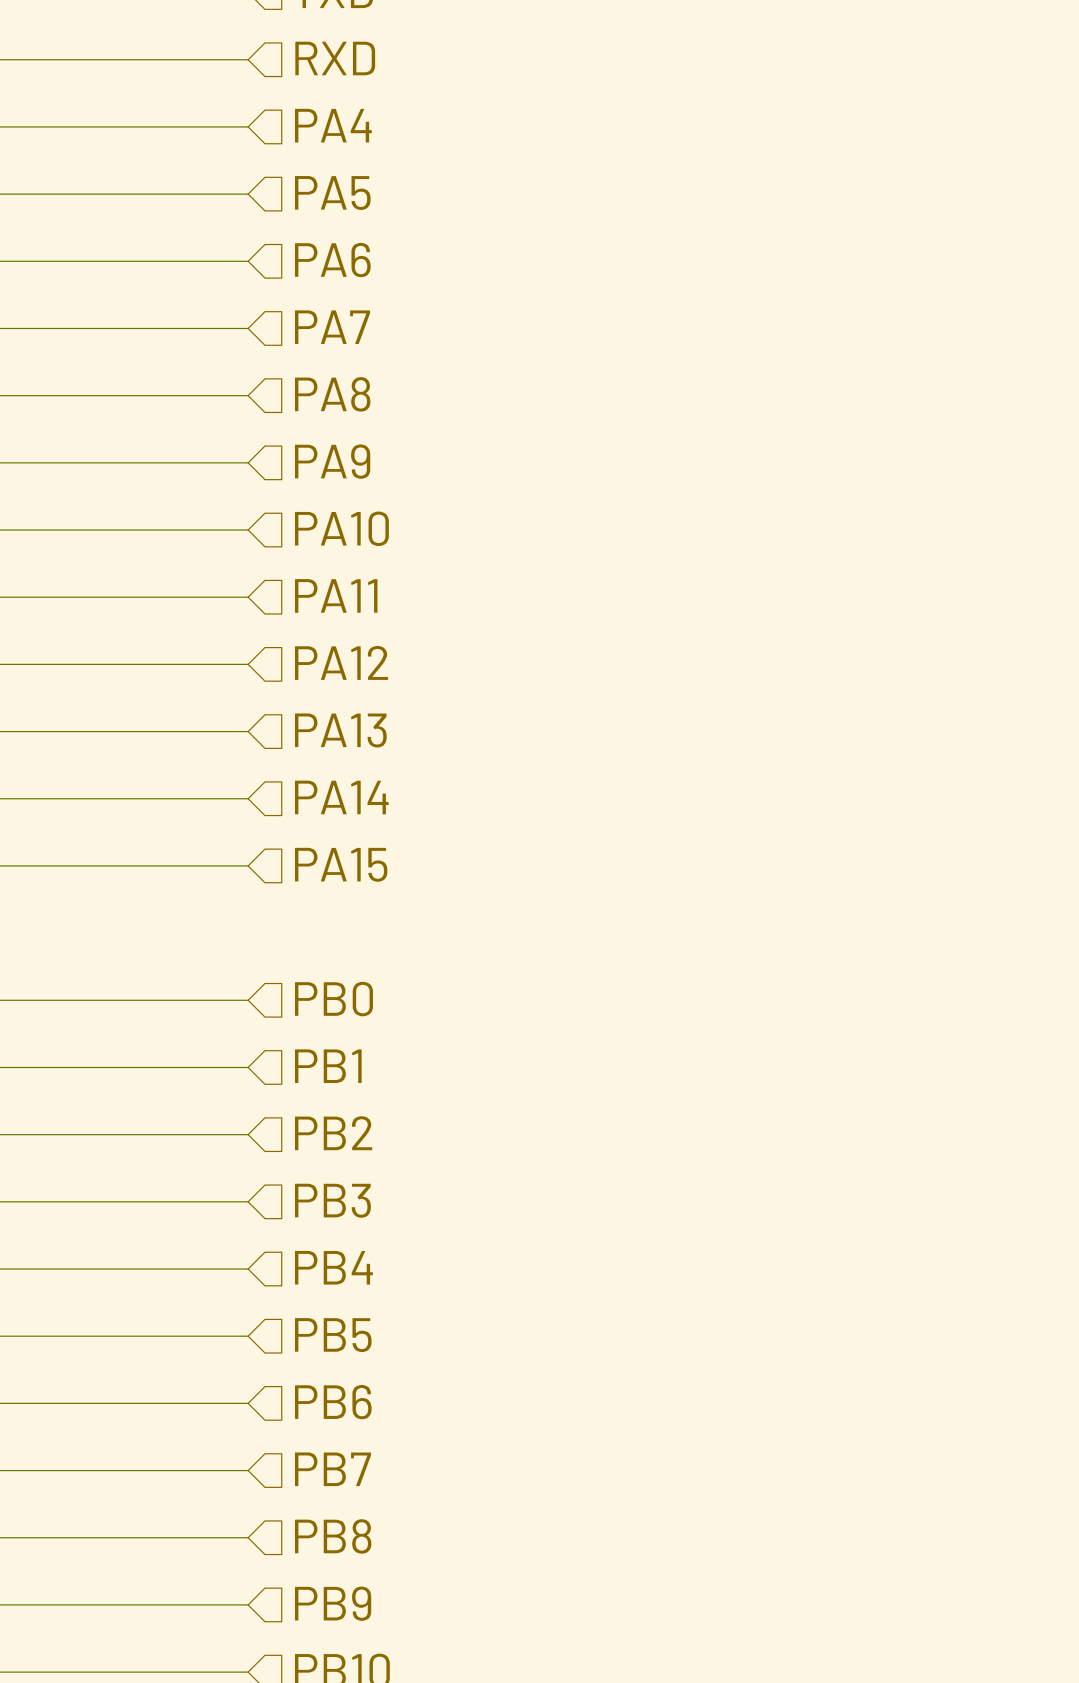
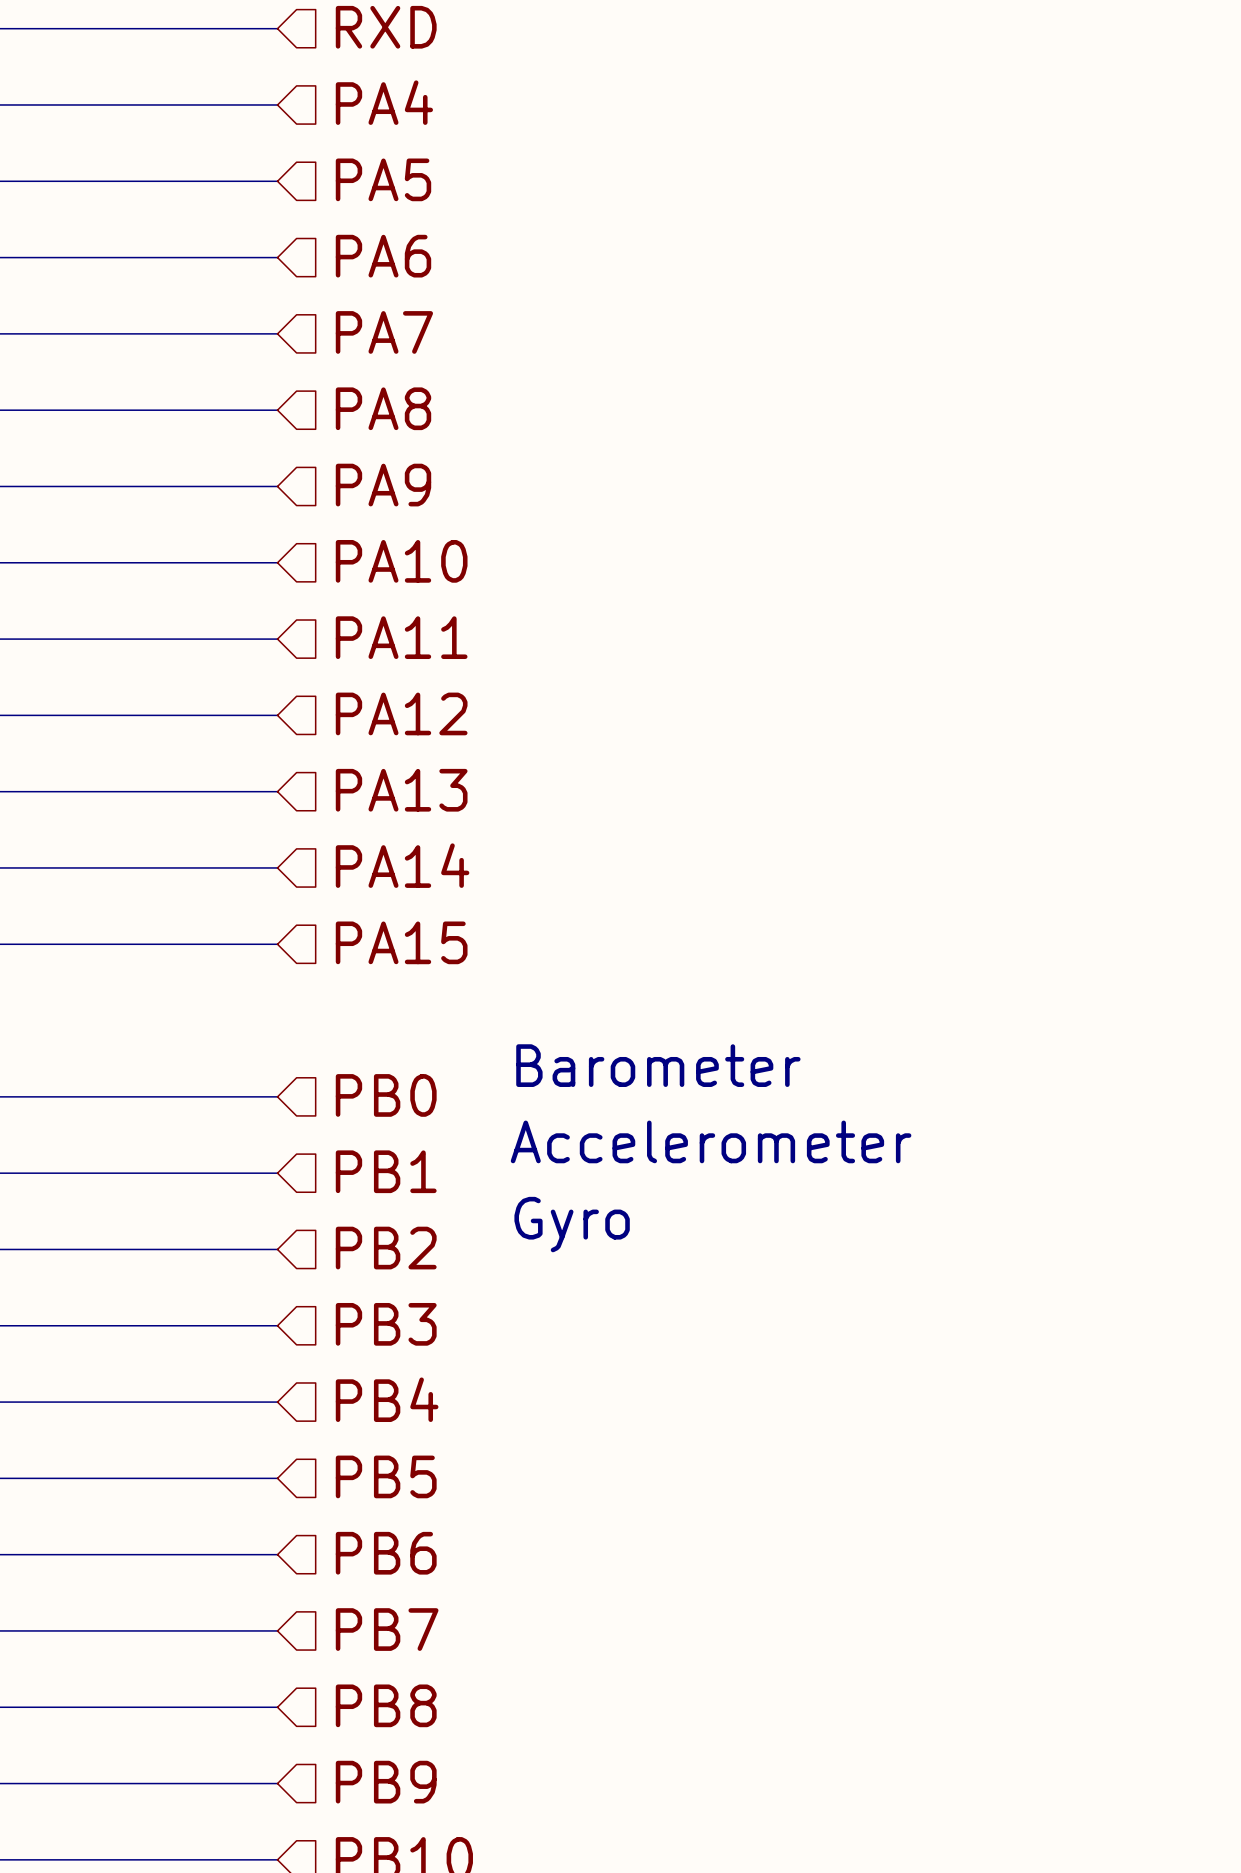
text: none -> Barometer (658, 1065)
text: none -> Accelerometer (711, 1141)
text: none -> Gyro (572, 1224)

